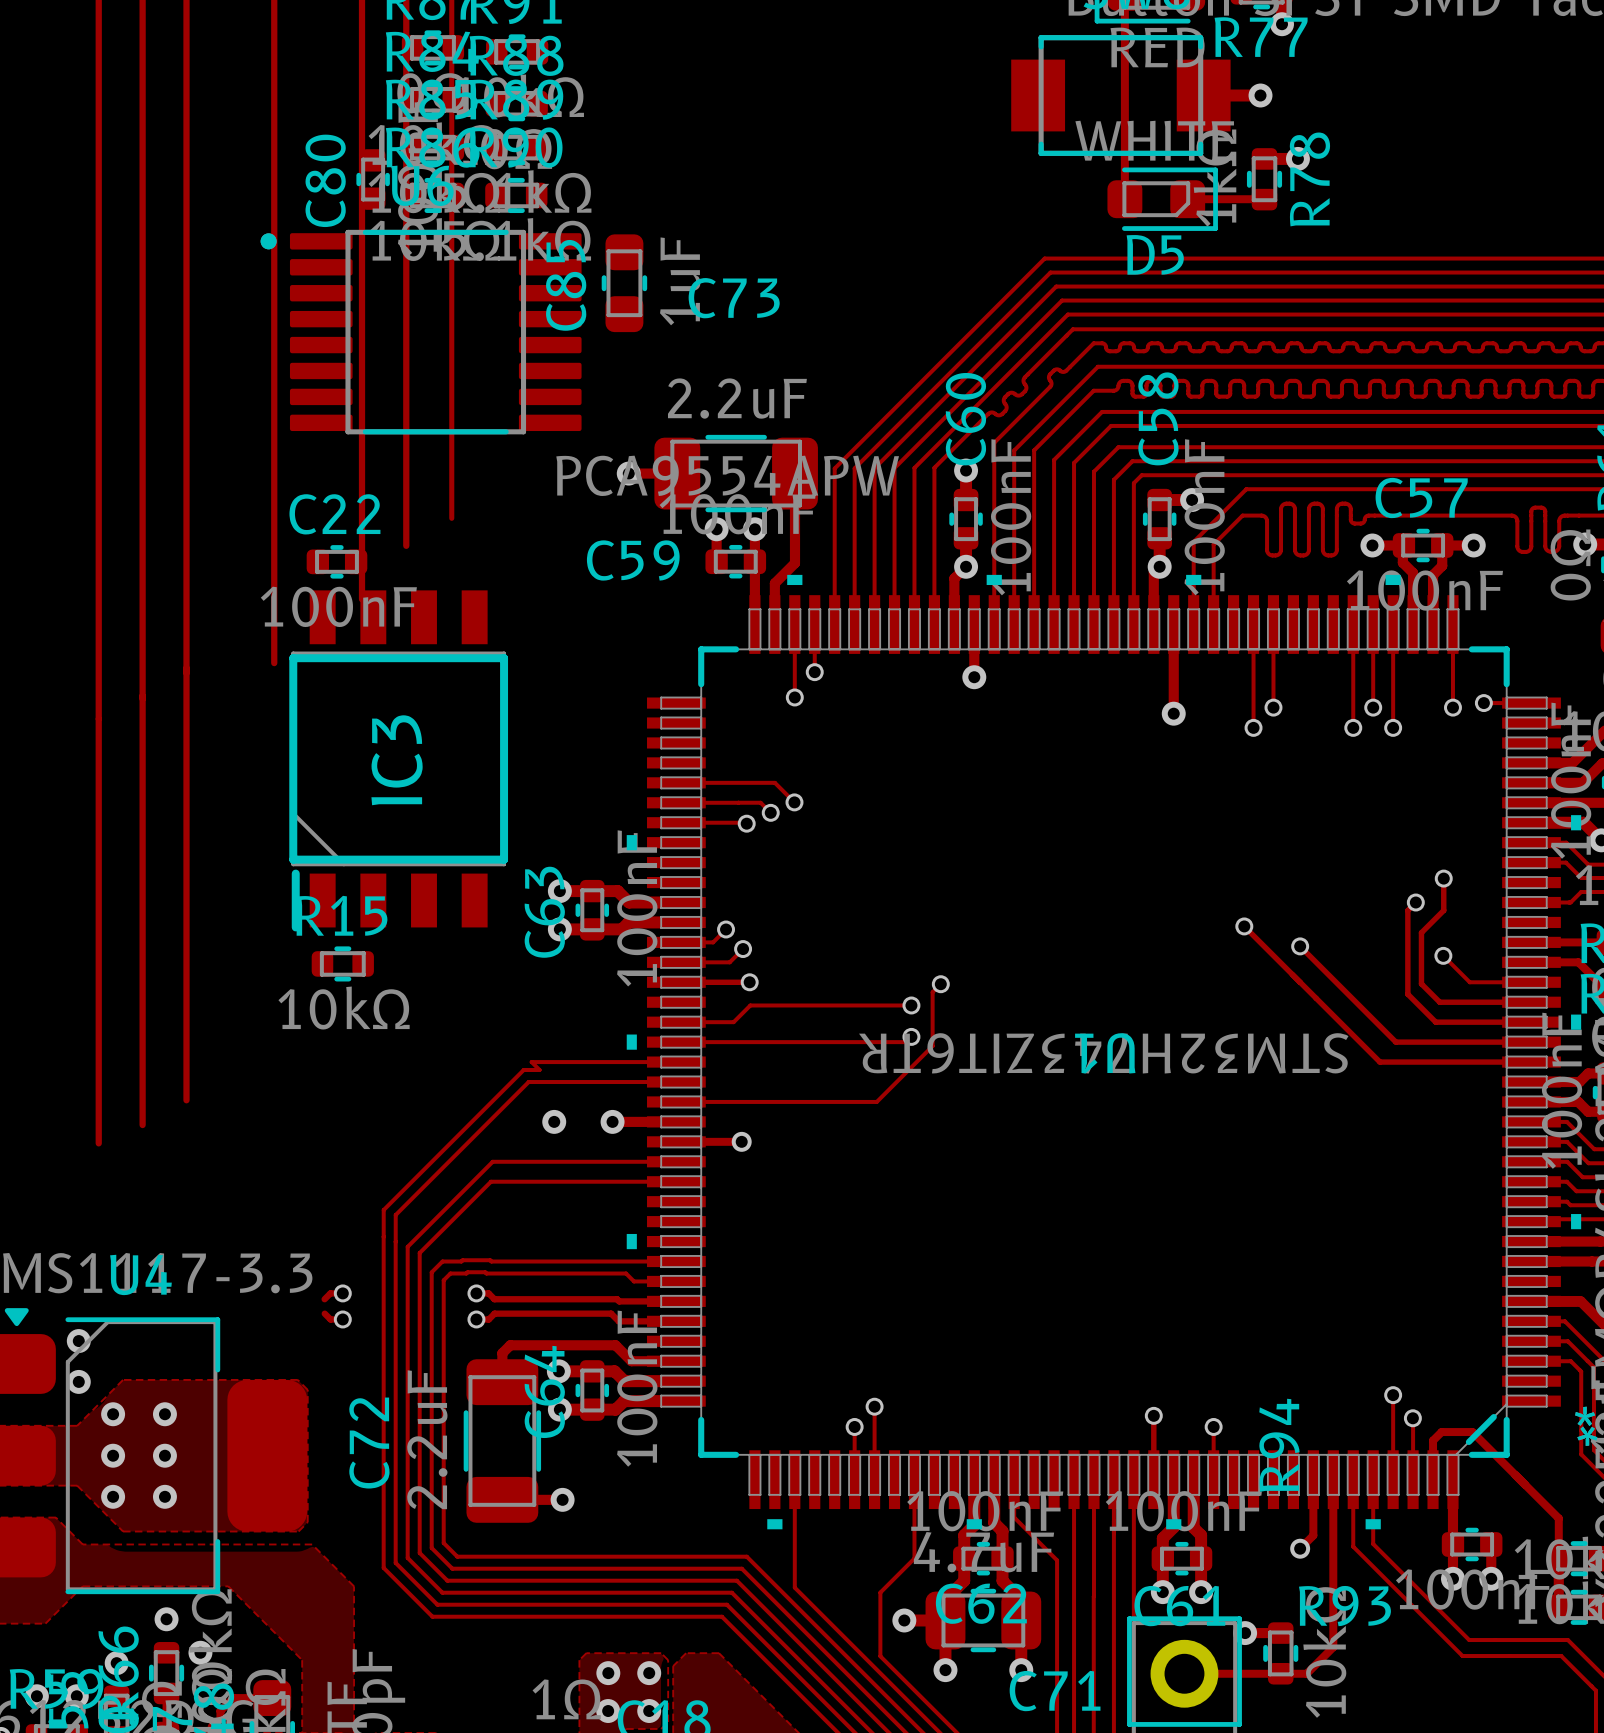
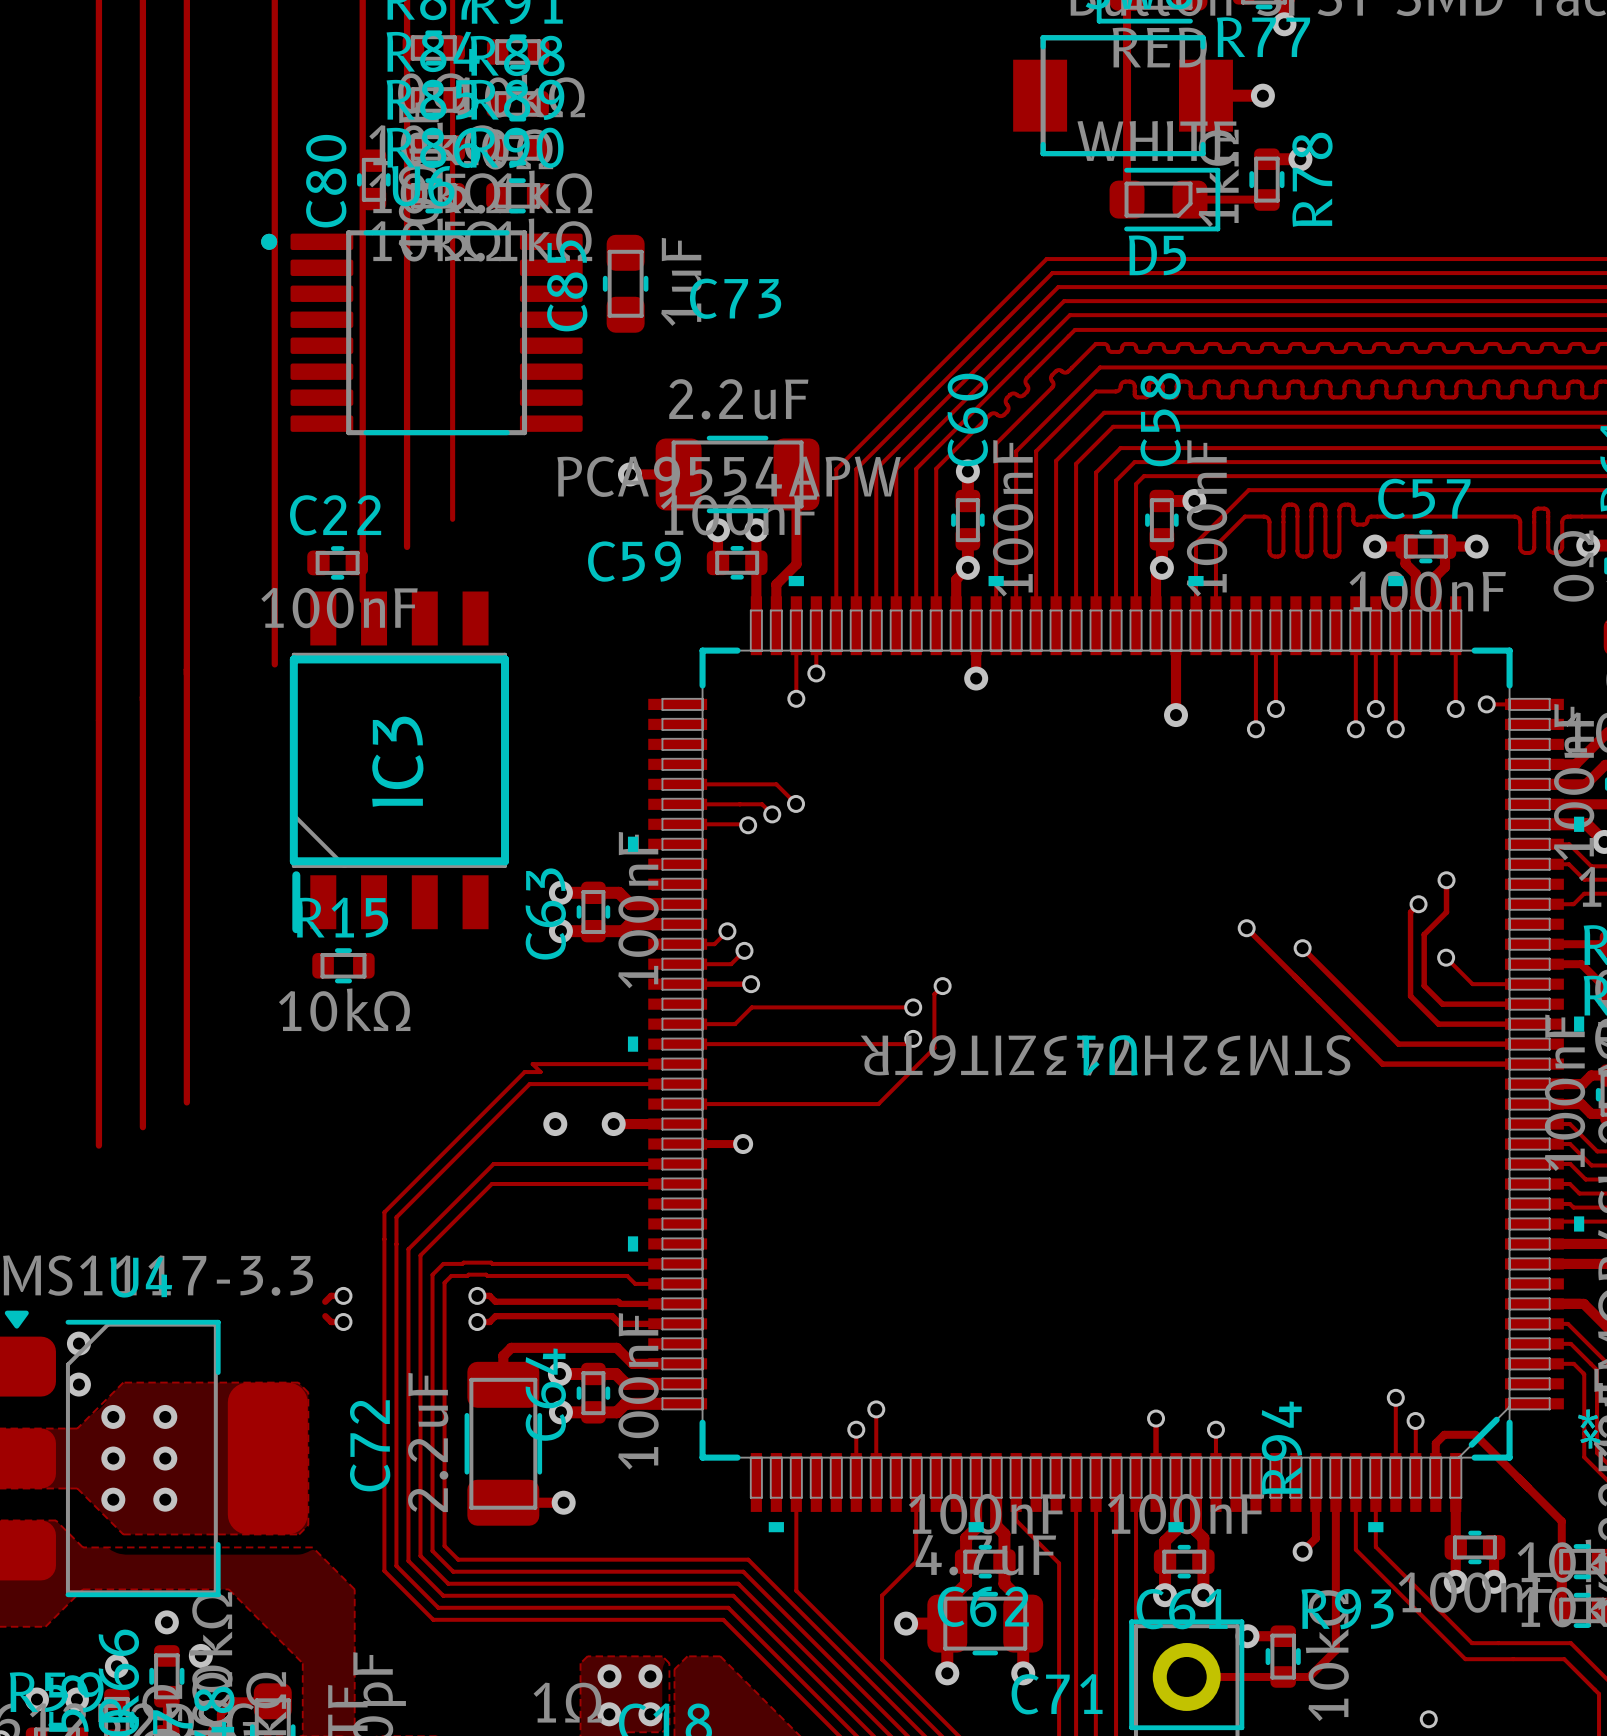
via: none -> (1428, 1719)

